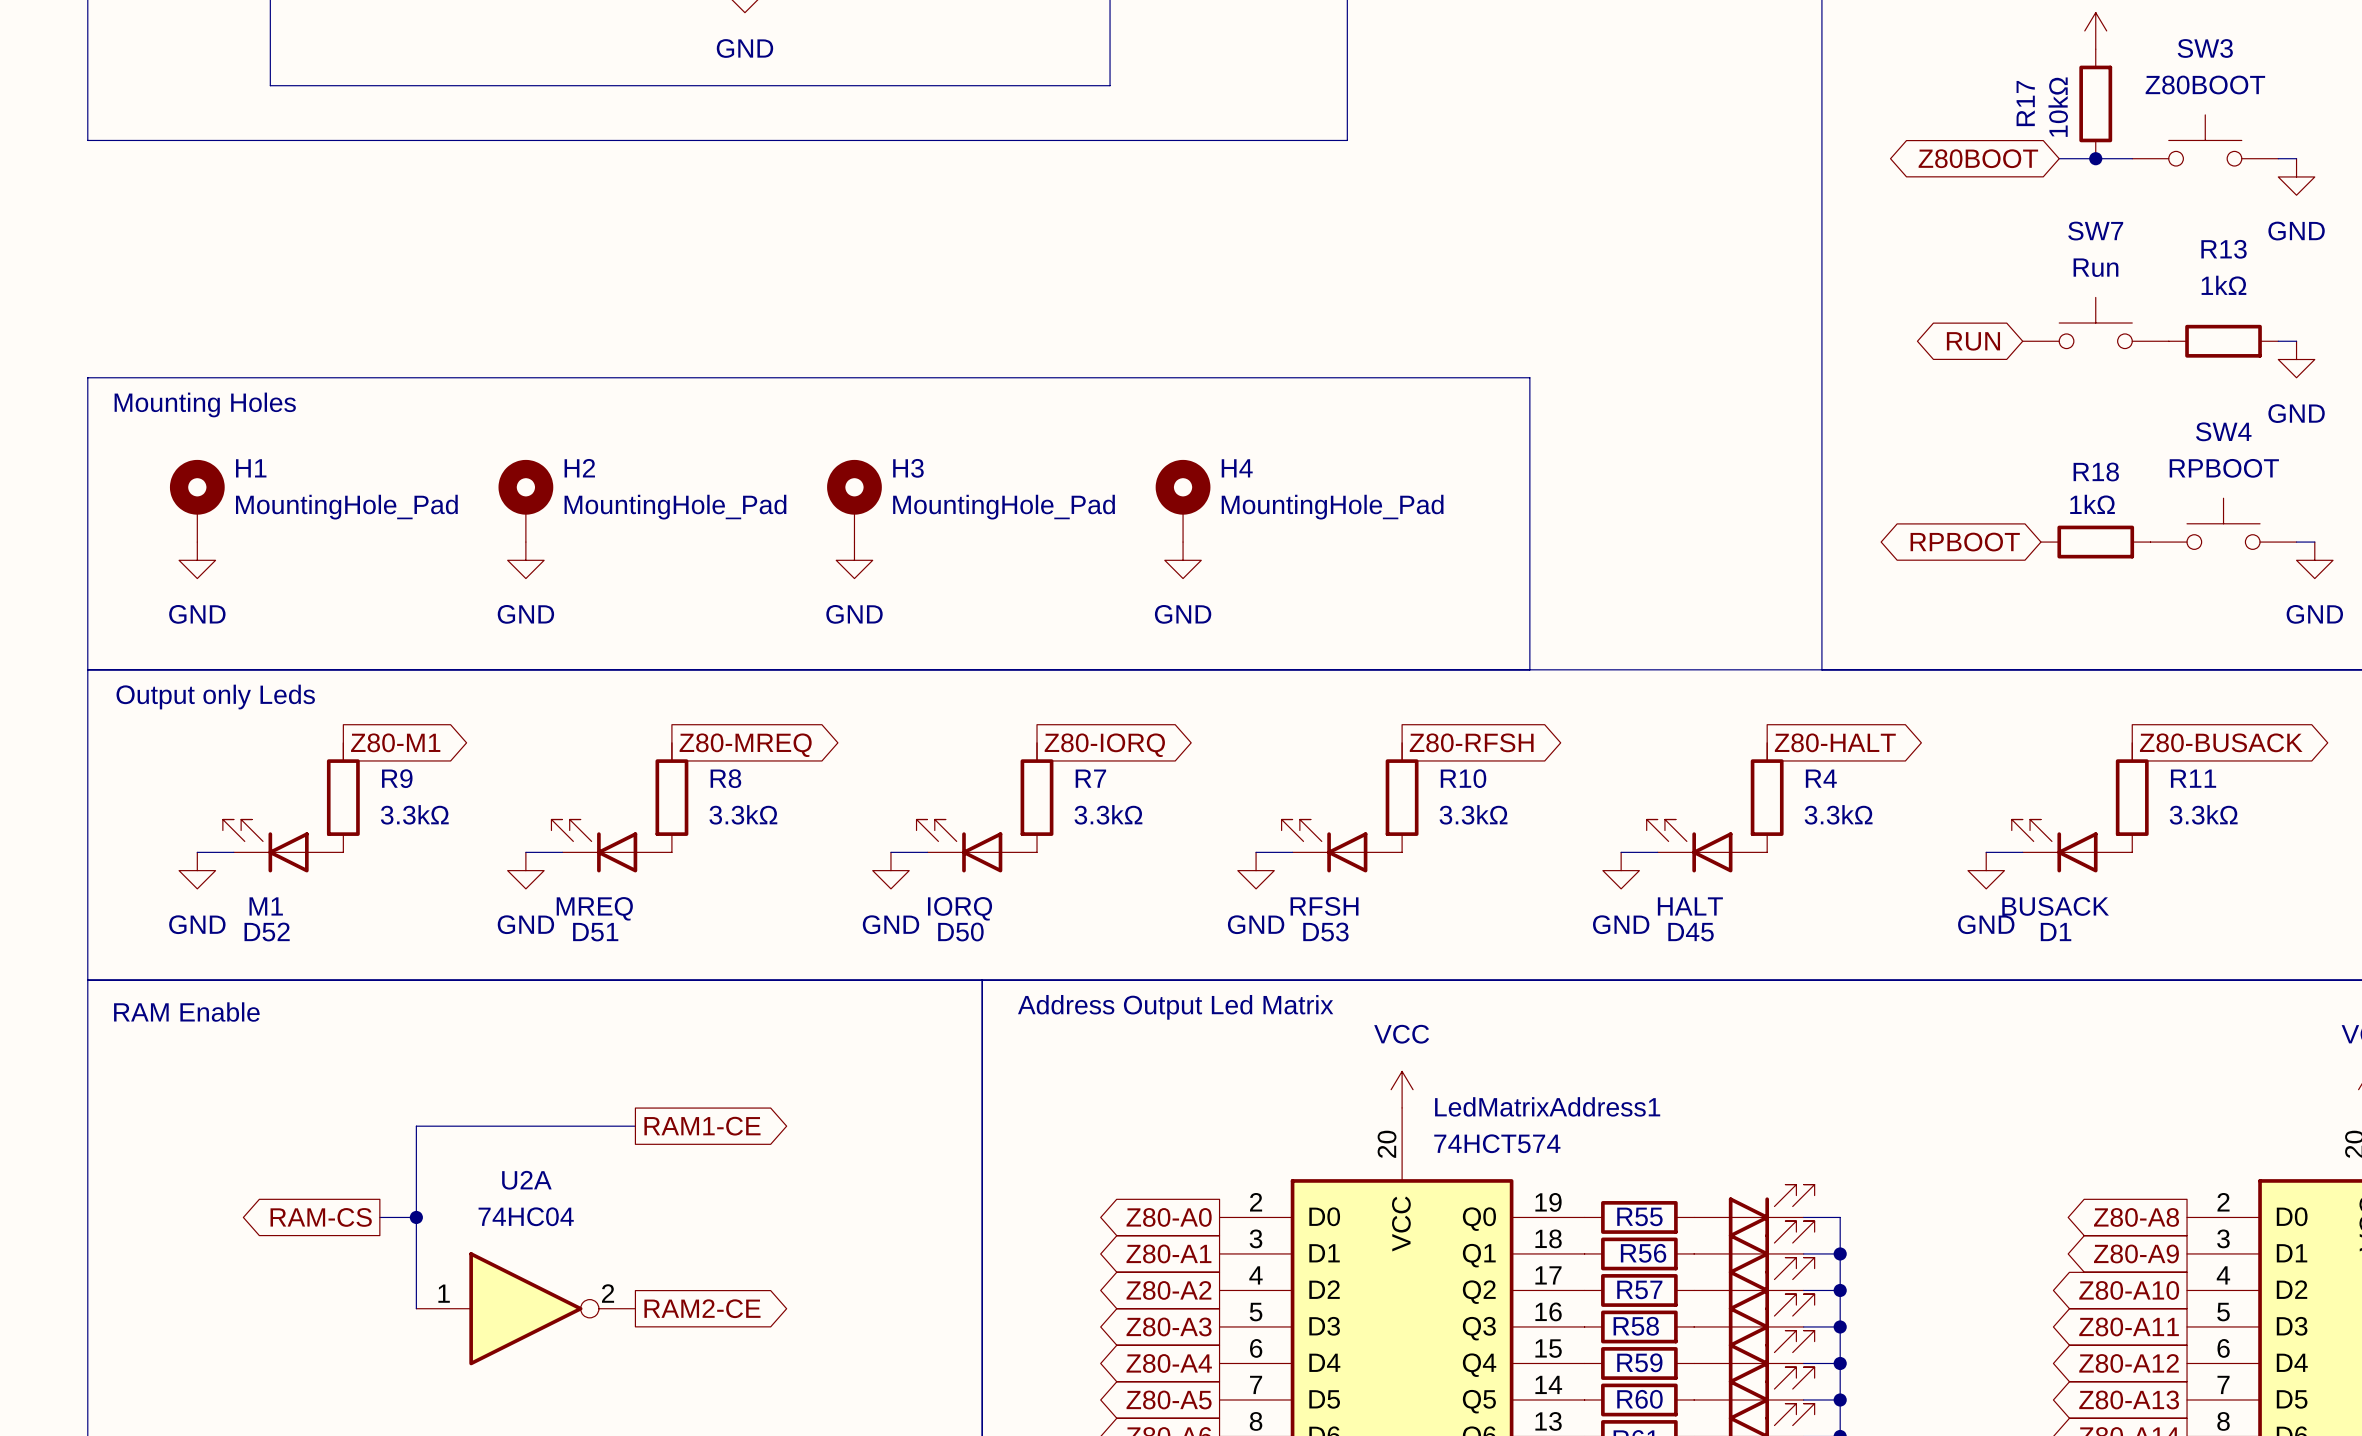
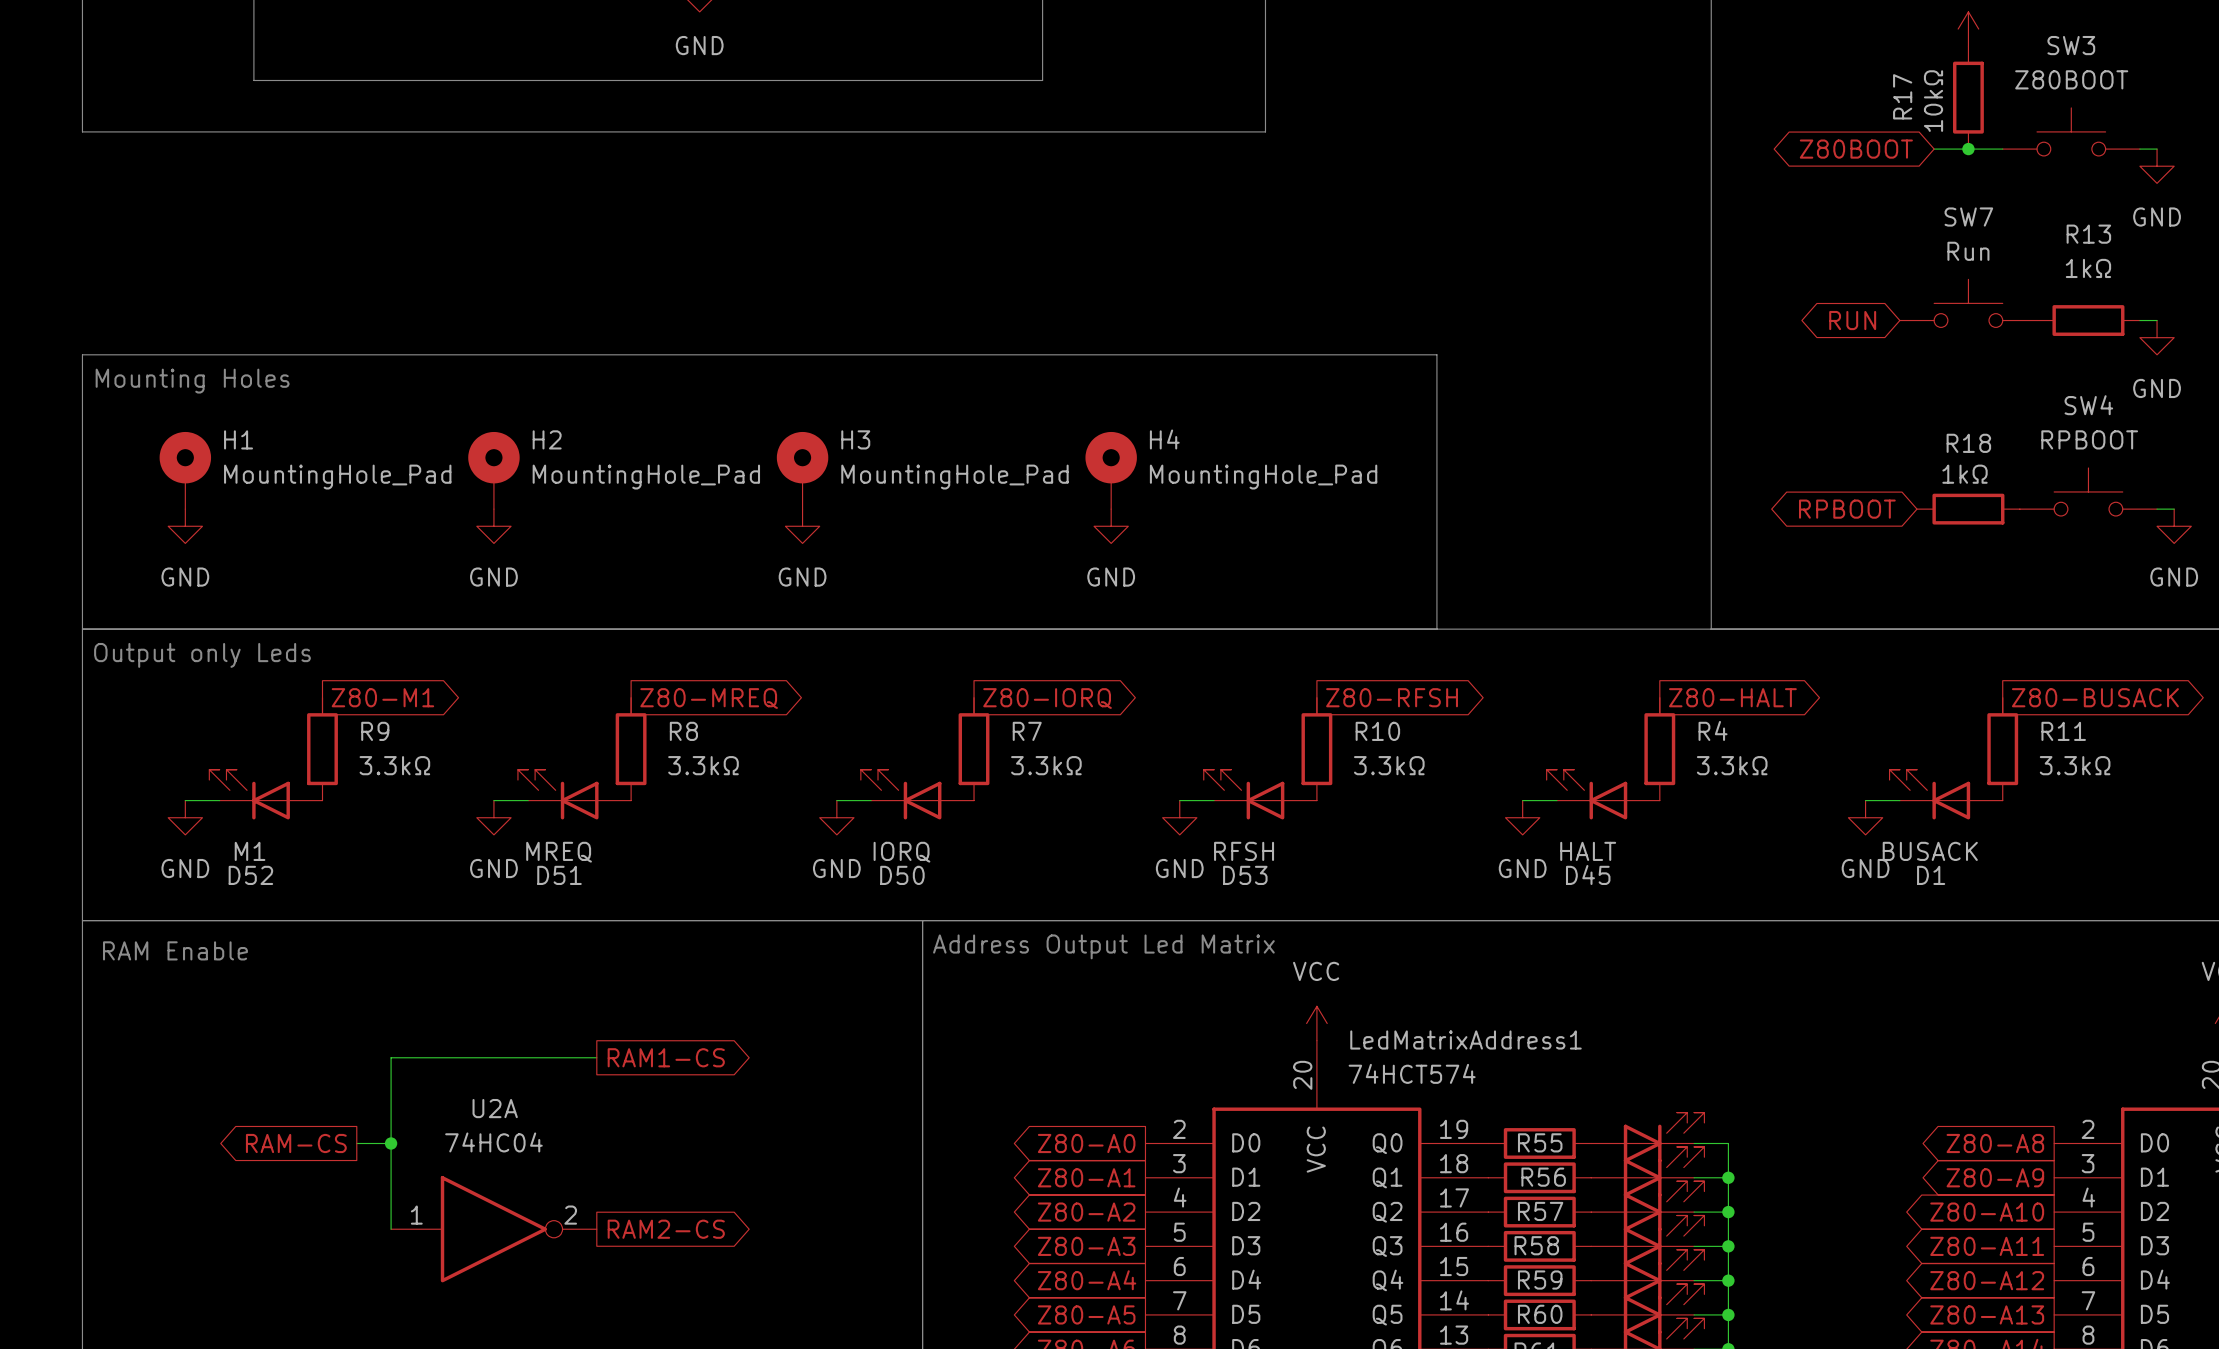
global label: RAM1-CE (702, 1126) -> RAM1-CS (666, 1057)
global label: RAM2-CE (702, 1308) -> RAM2-CS (666, 1229)

